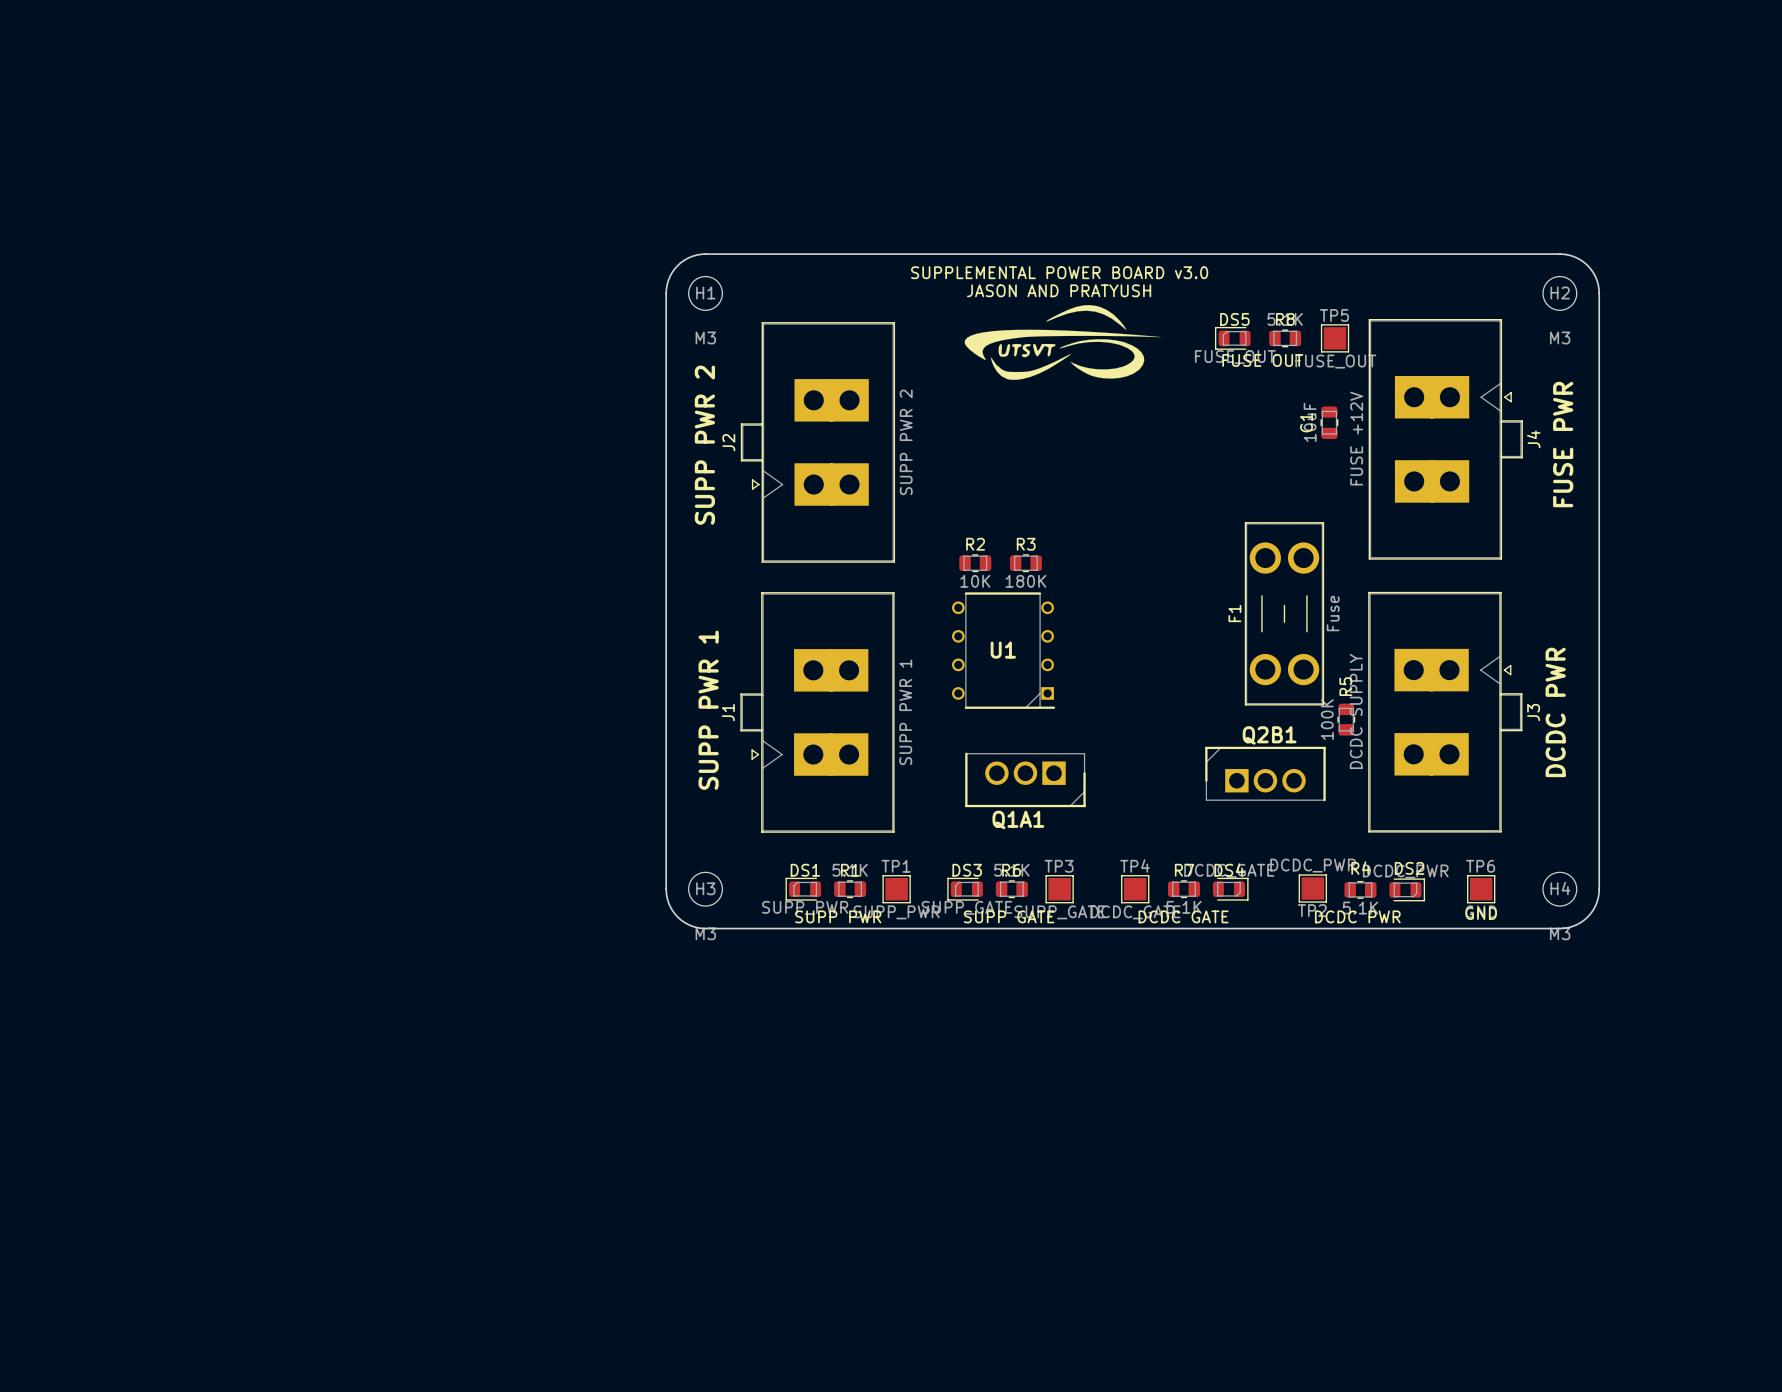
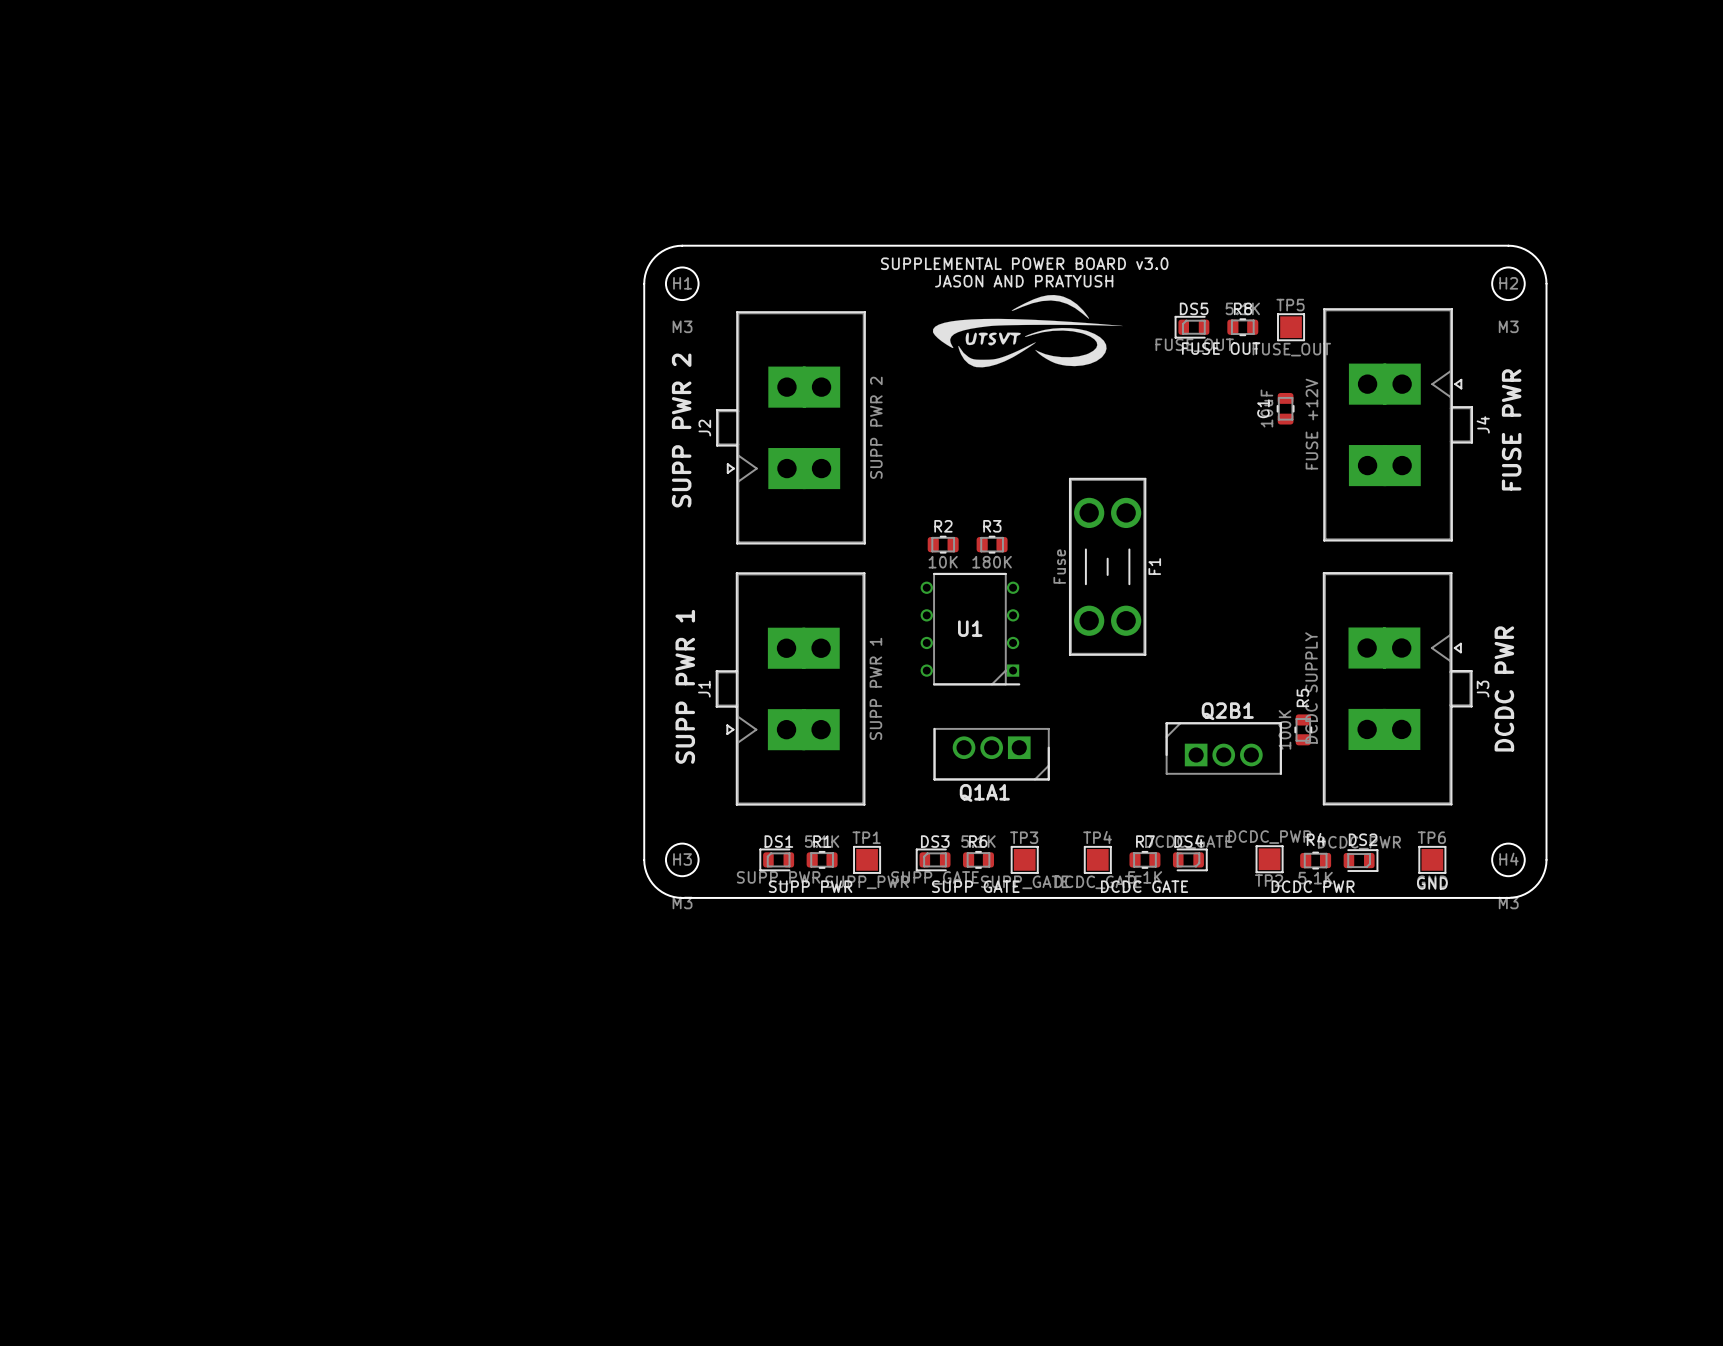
F1 name position: F1 (1234, 613) -> F1 (1154, 566)
F1 position: (1284, 613) -> (1107, 566)
F1 value position: Fuse (1333, 613) -> Fuse (1059, 566)
R5 position: (1346, 719) -> (1303, 729)

